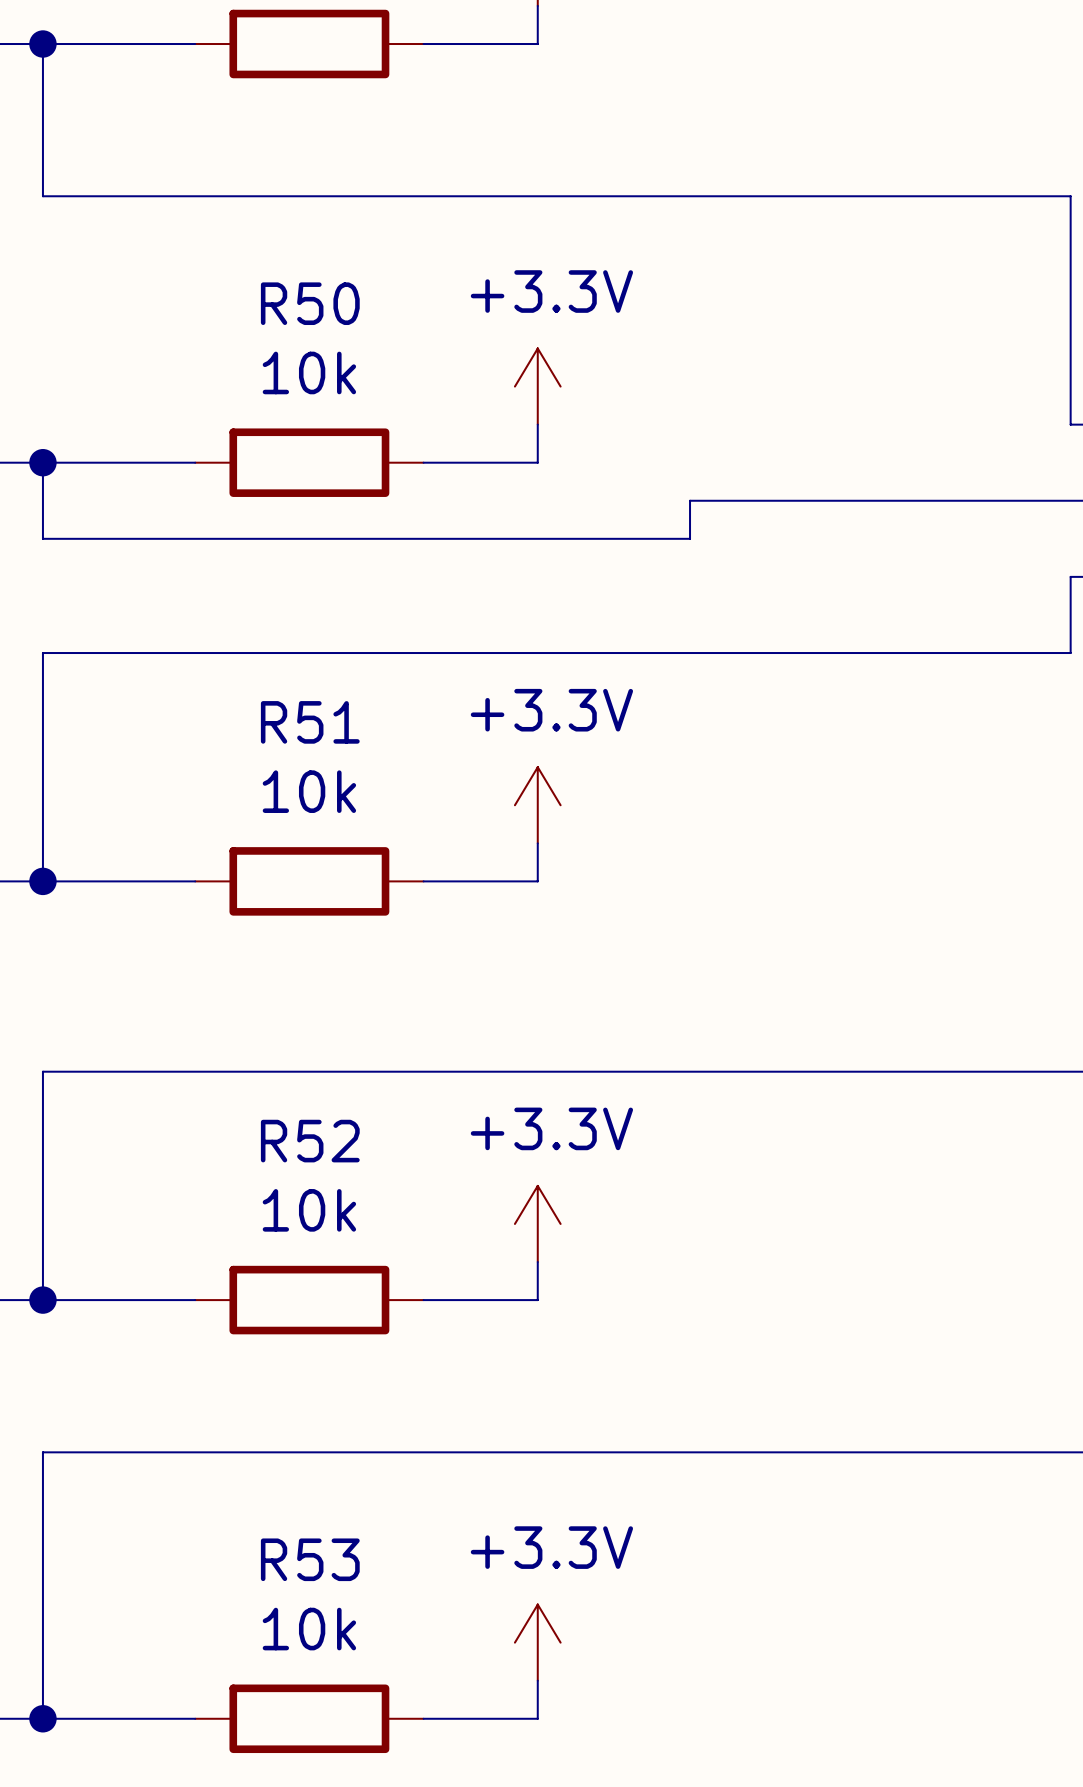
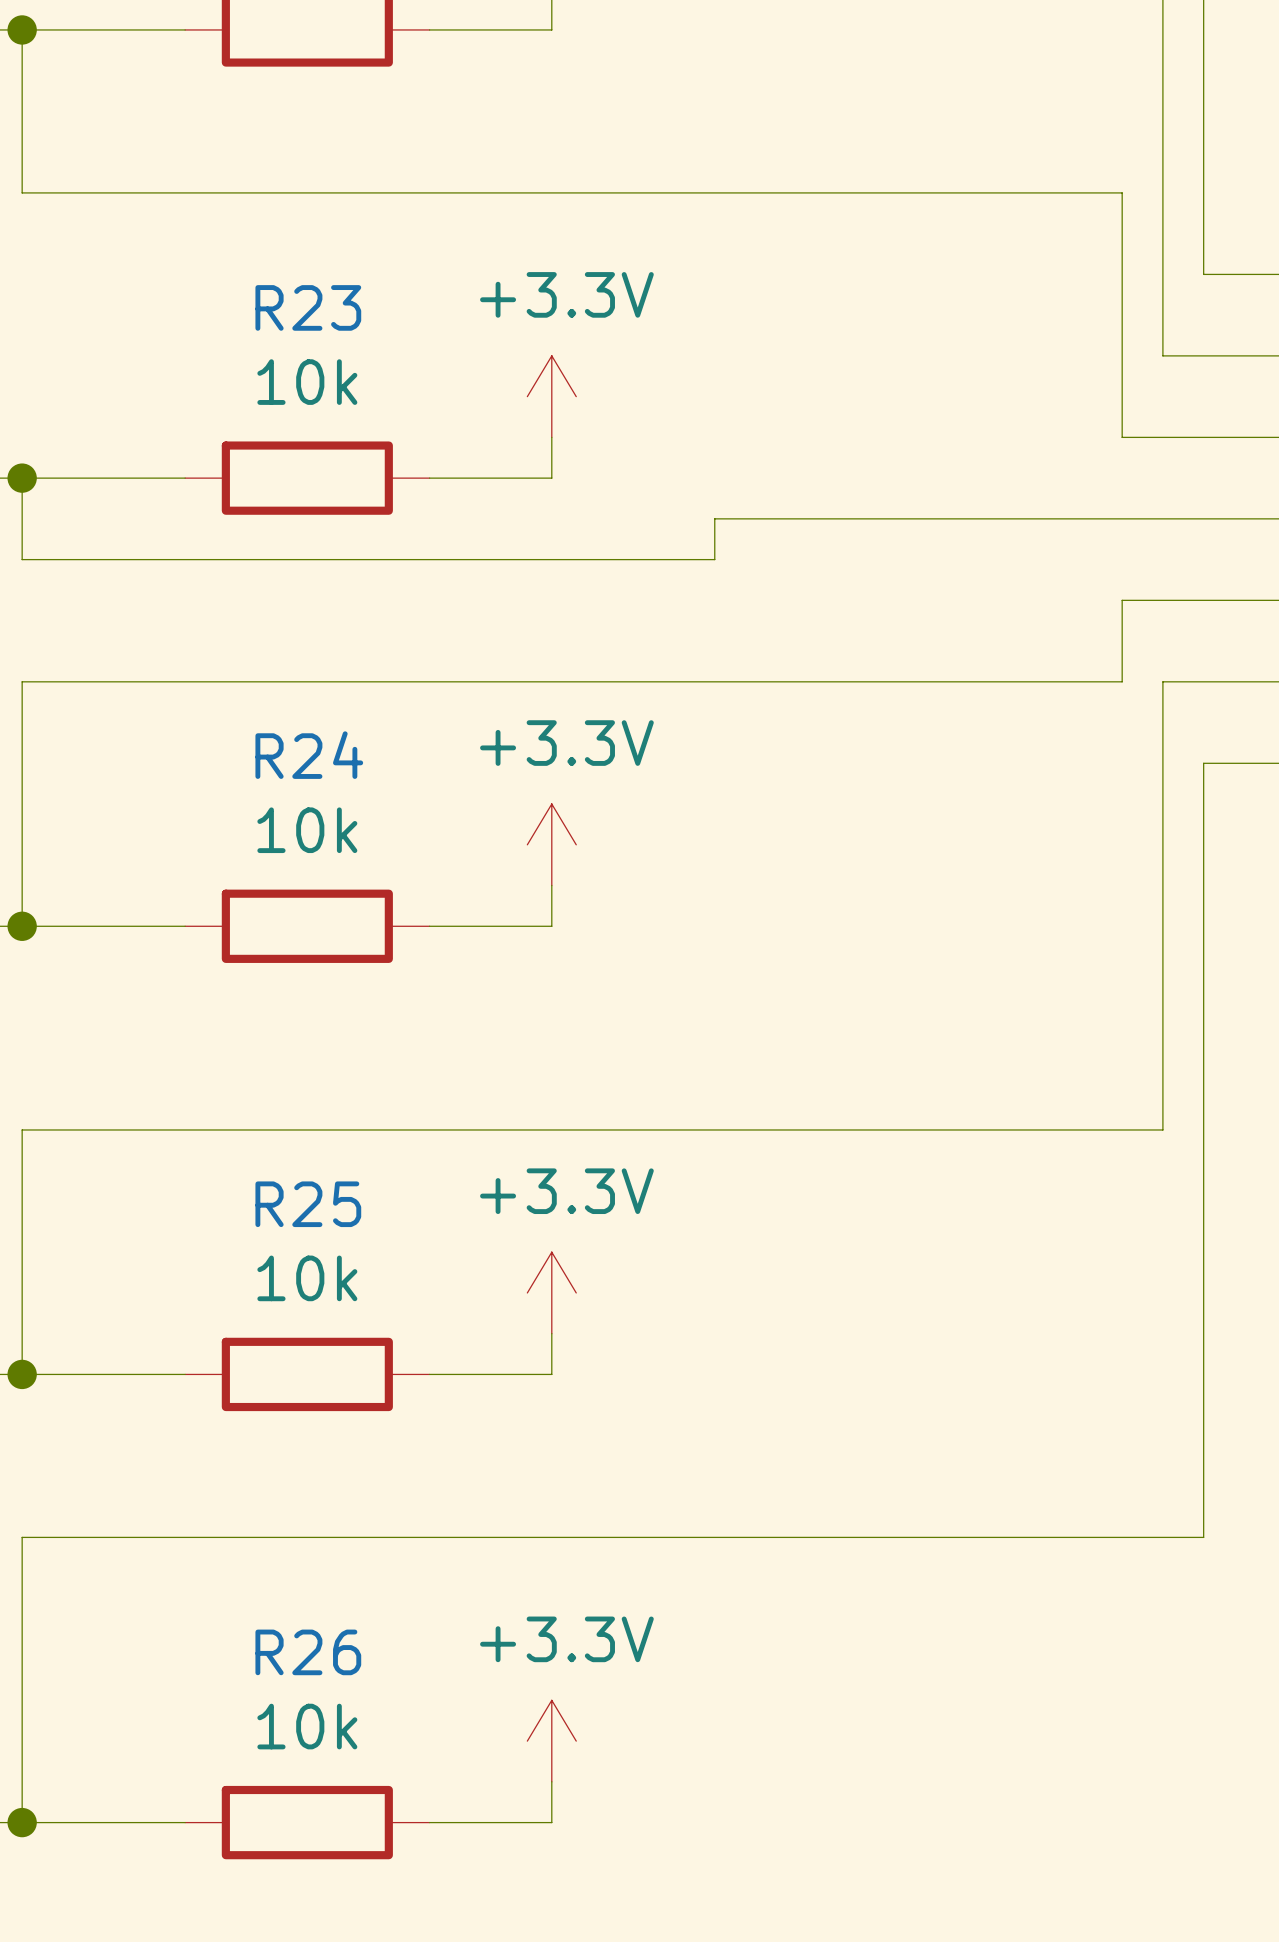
R50 name: R50 (310, 303) -> R23 (308, 307)
R51 name: R51 (310, 722) -> R24 (309, 755)
R52 name: R52 (310, 1141) -> R25 (308, 1204)
R53 name: R53 (310, 1559) -> R26 (308, 1652)

